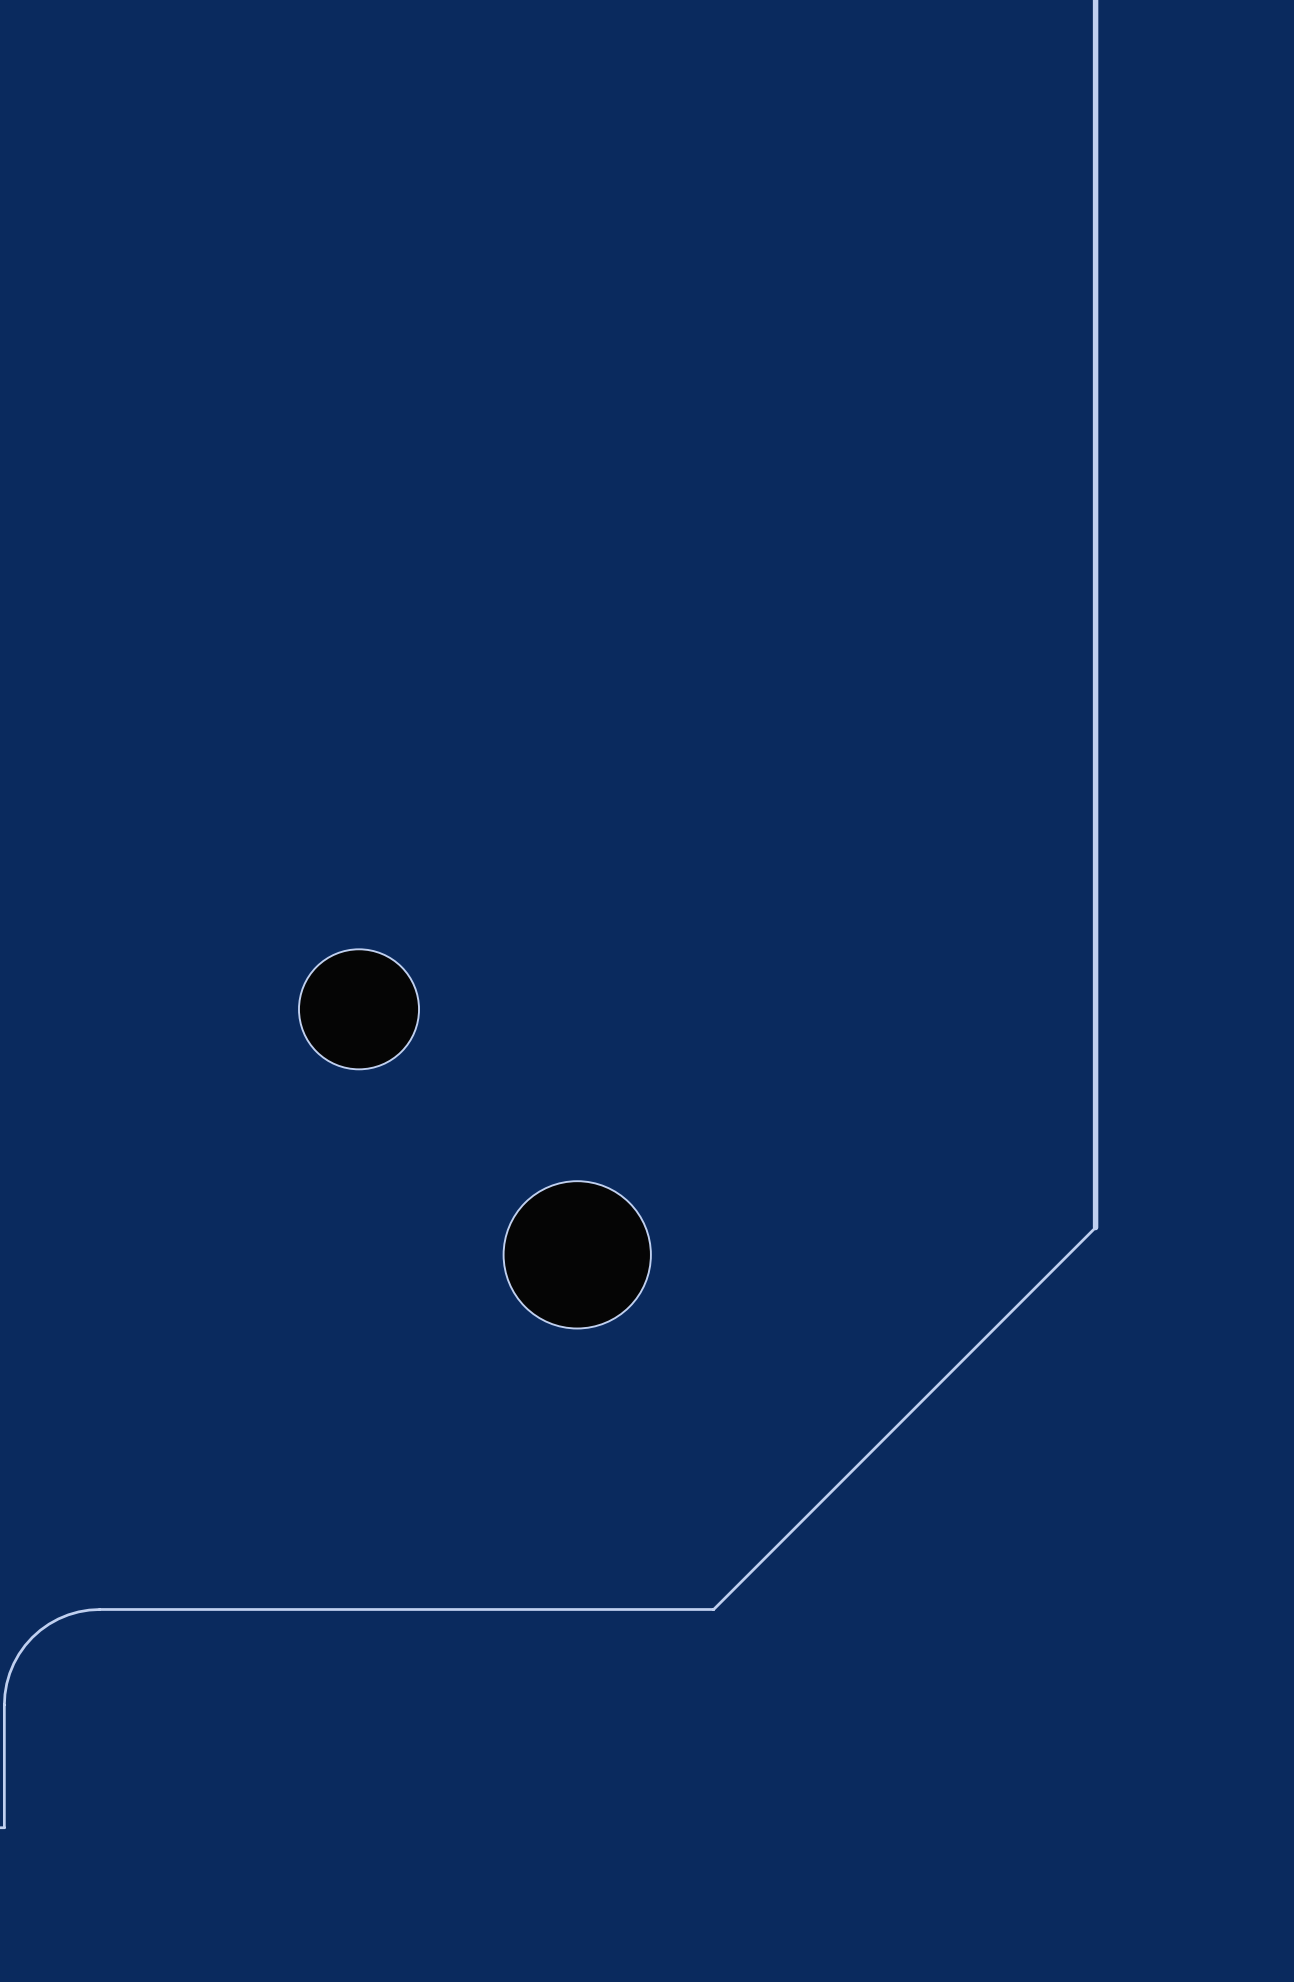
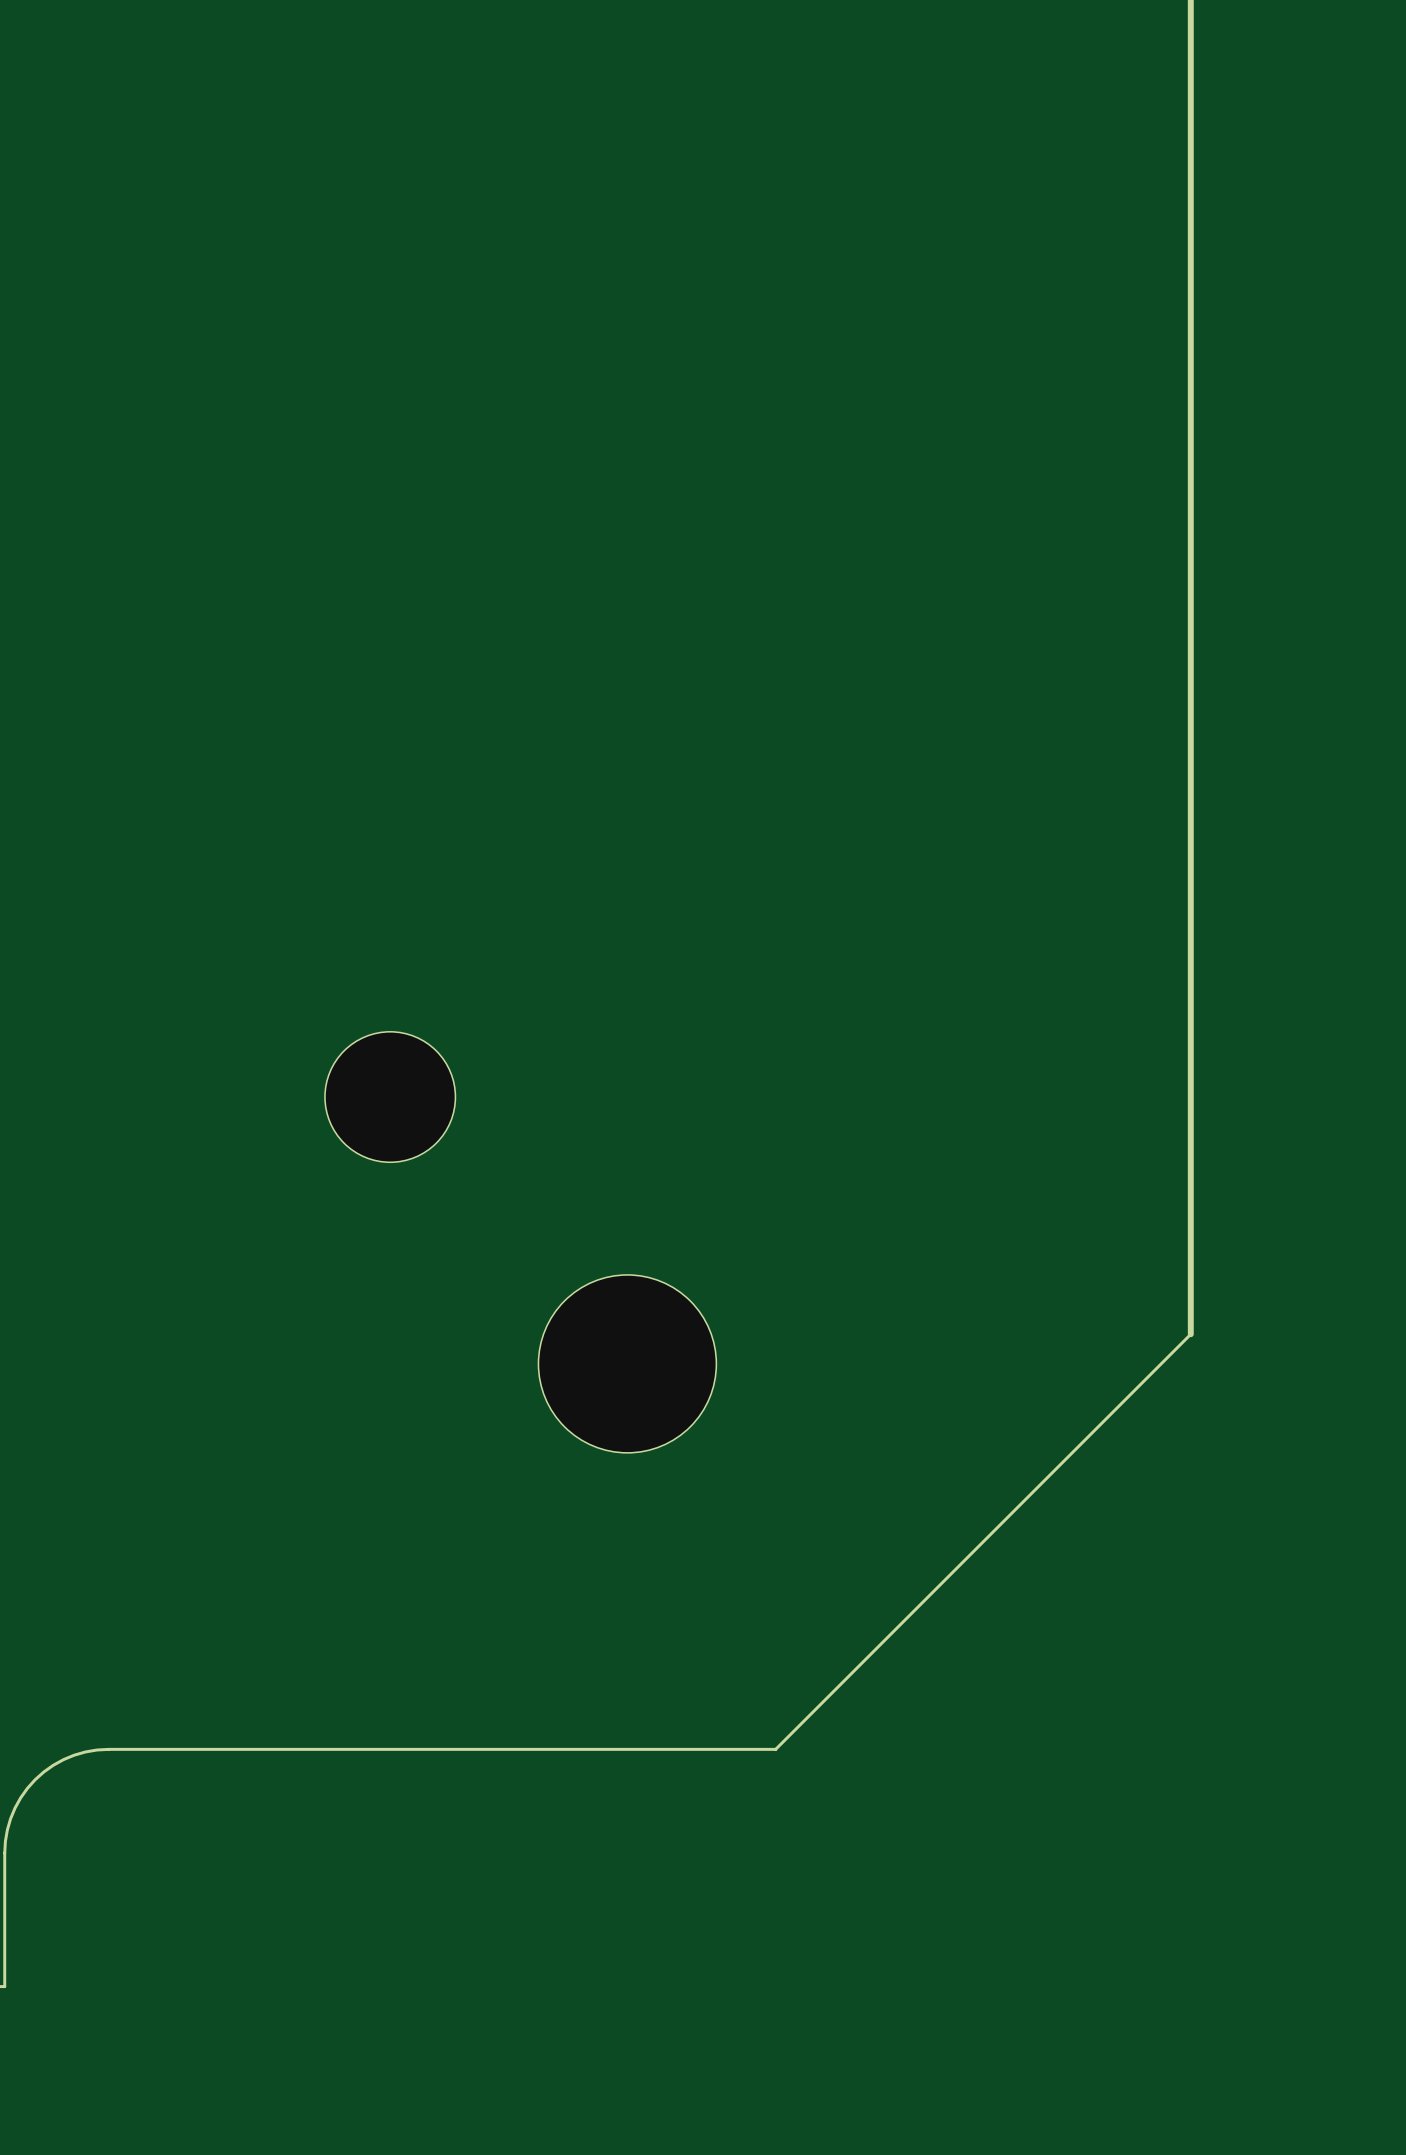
part footprint: [503, 1181, 651, 1329] -> [538, 1274, 717, 1453]

